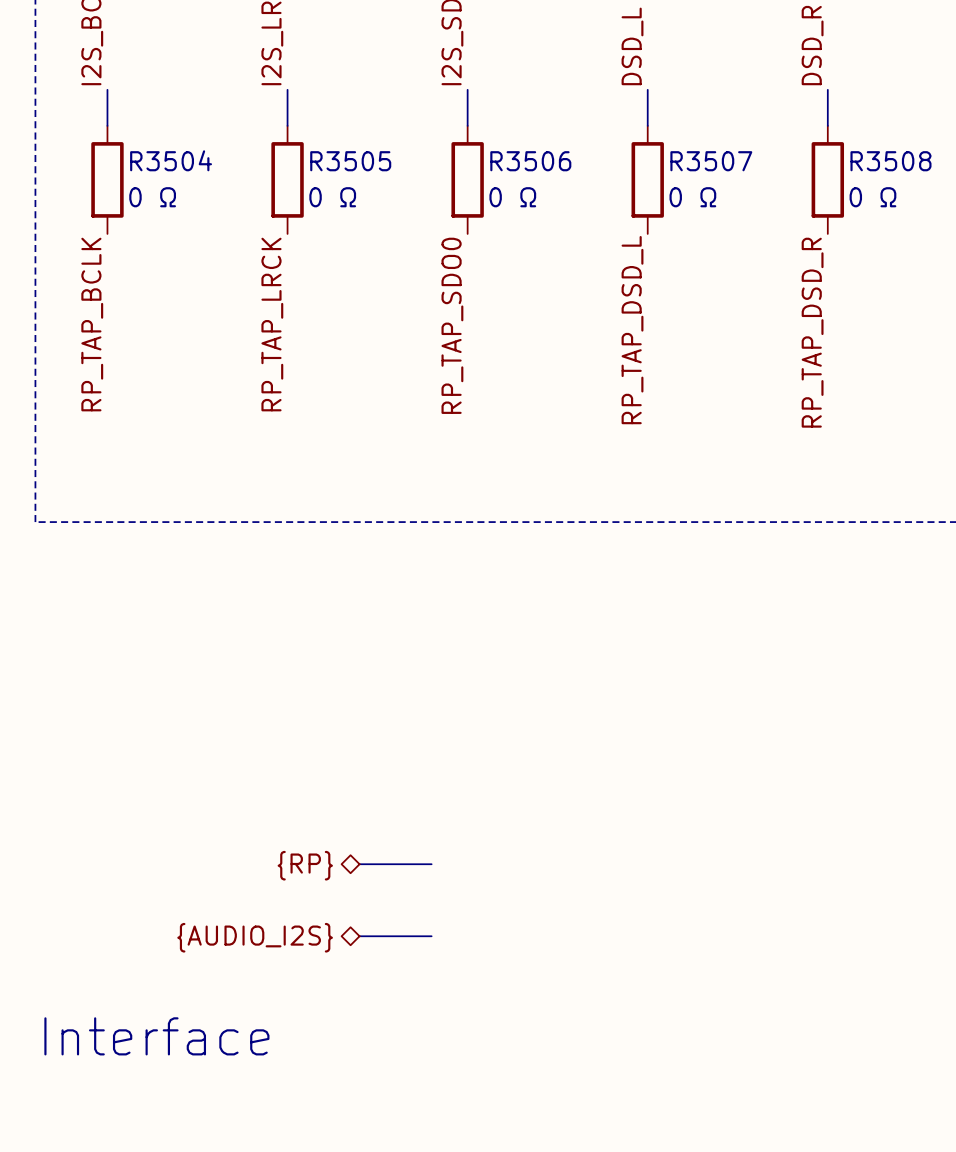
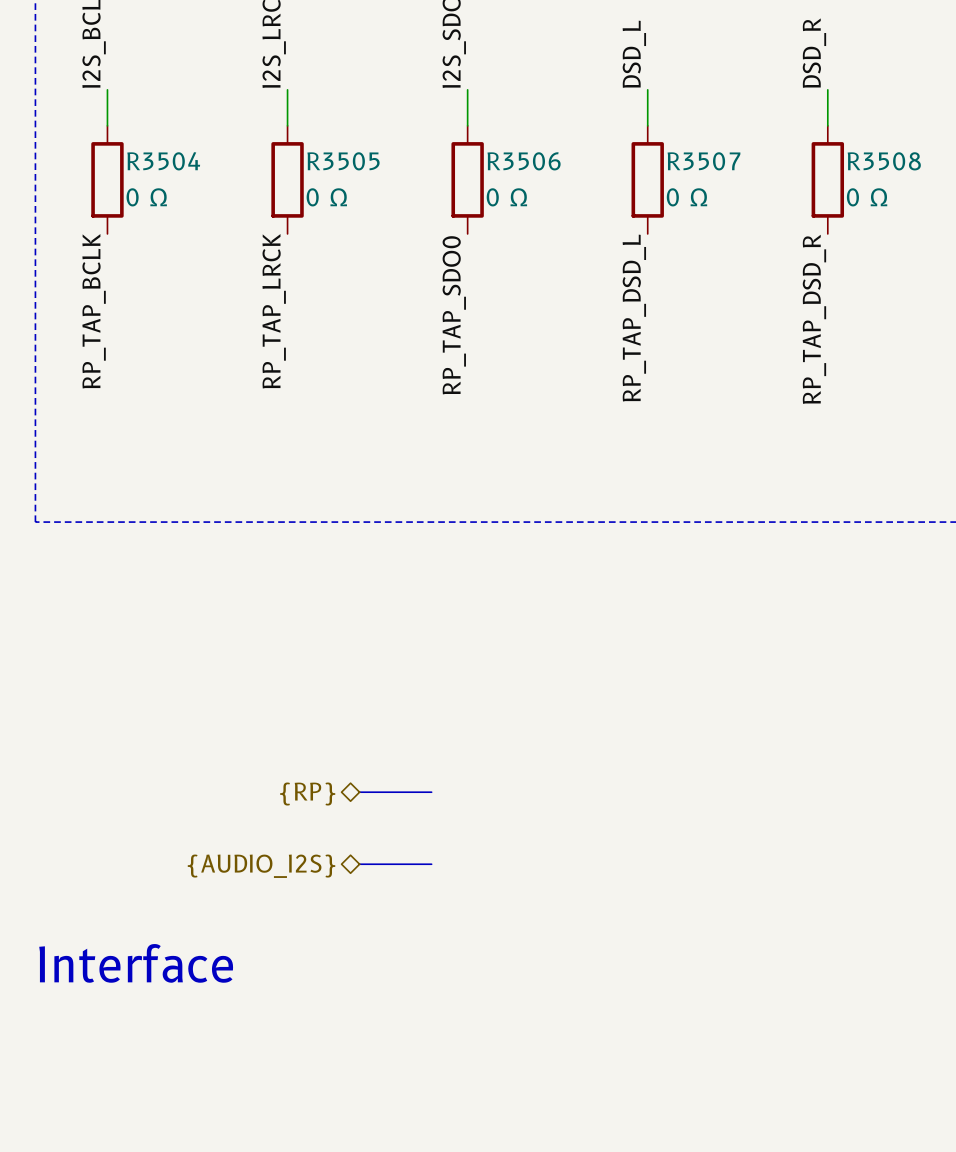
hierarchical label: none -> {RP} (307, 794)
hierarchical label: {RP} (305, 865) -> {AUDIO_I2S} (261, 866)
bus: (359, 936) (431, 936) -> (359, 792) (431, 792)
hierarchical label: {AUDIO_I2S} (255, 937) -> none
text position: Interface (156, 1036) -> Interface (136, 963)

